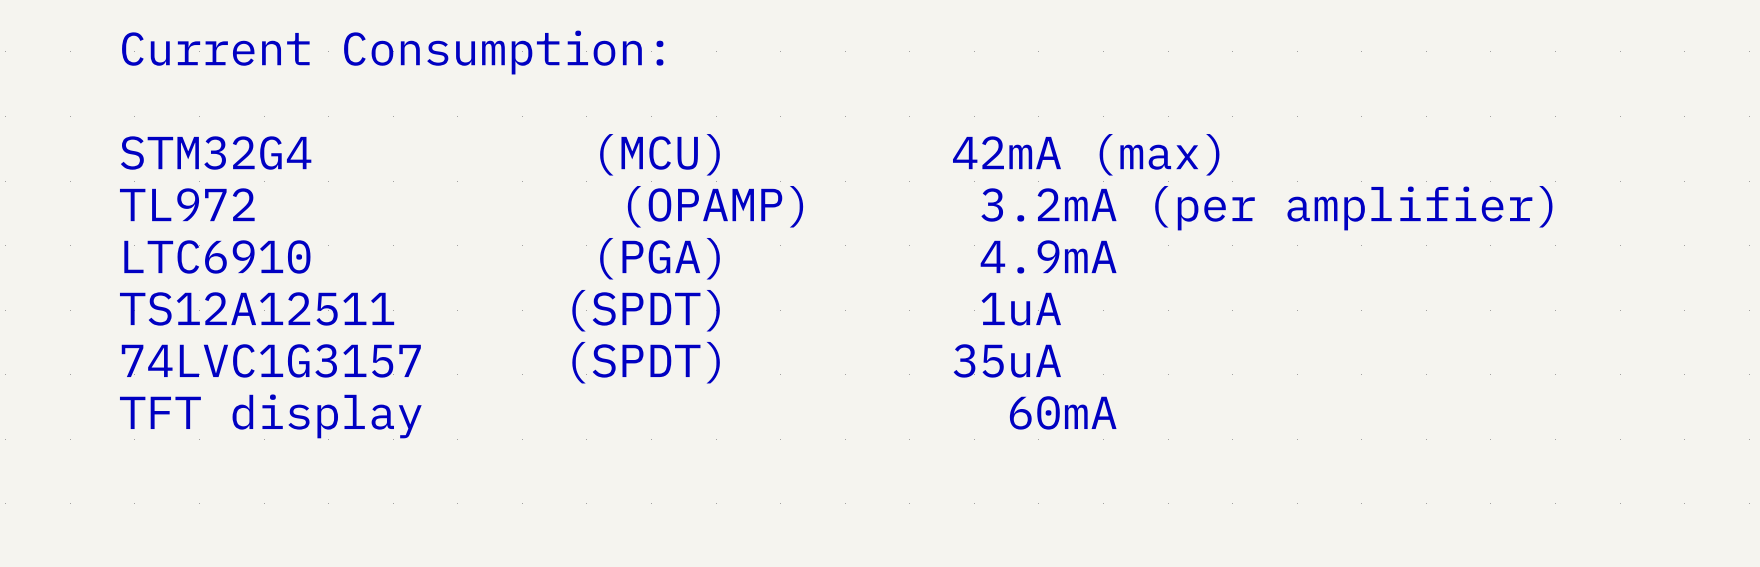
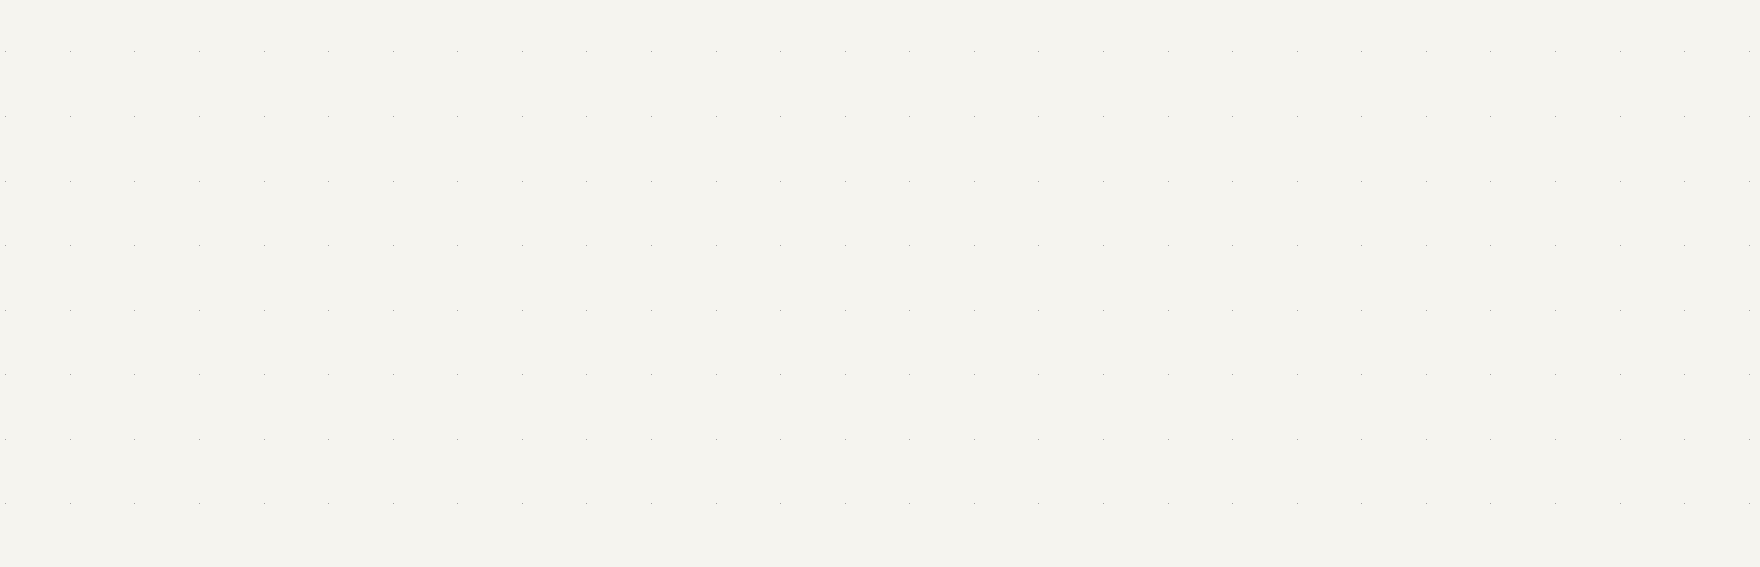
text: Current Consumption: (392, 52) -> none
text: STM32G4 (MCU) 42mA (max) (670, 154) -> none
text: TL972 (OPAMP) 3.2mA (per amplifier) (836, 208) -> none
text: LTC6910 (PGA) 4.9mA (620, 258) -> none
text: TS12A12511 (SPDT) 1uA (590, 310) -> none
text: 74LVC1G3157 (SPDT) 35uA (591, 362) -> none
text: TFT display 60mA (618, 416) -> none

